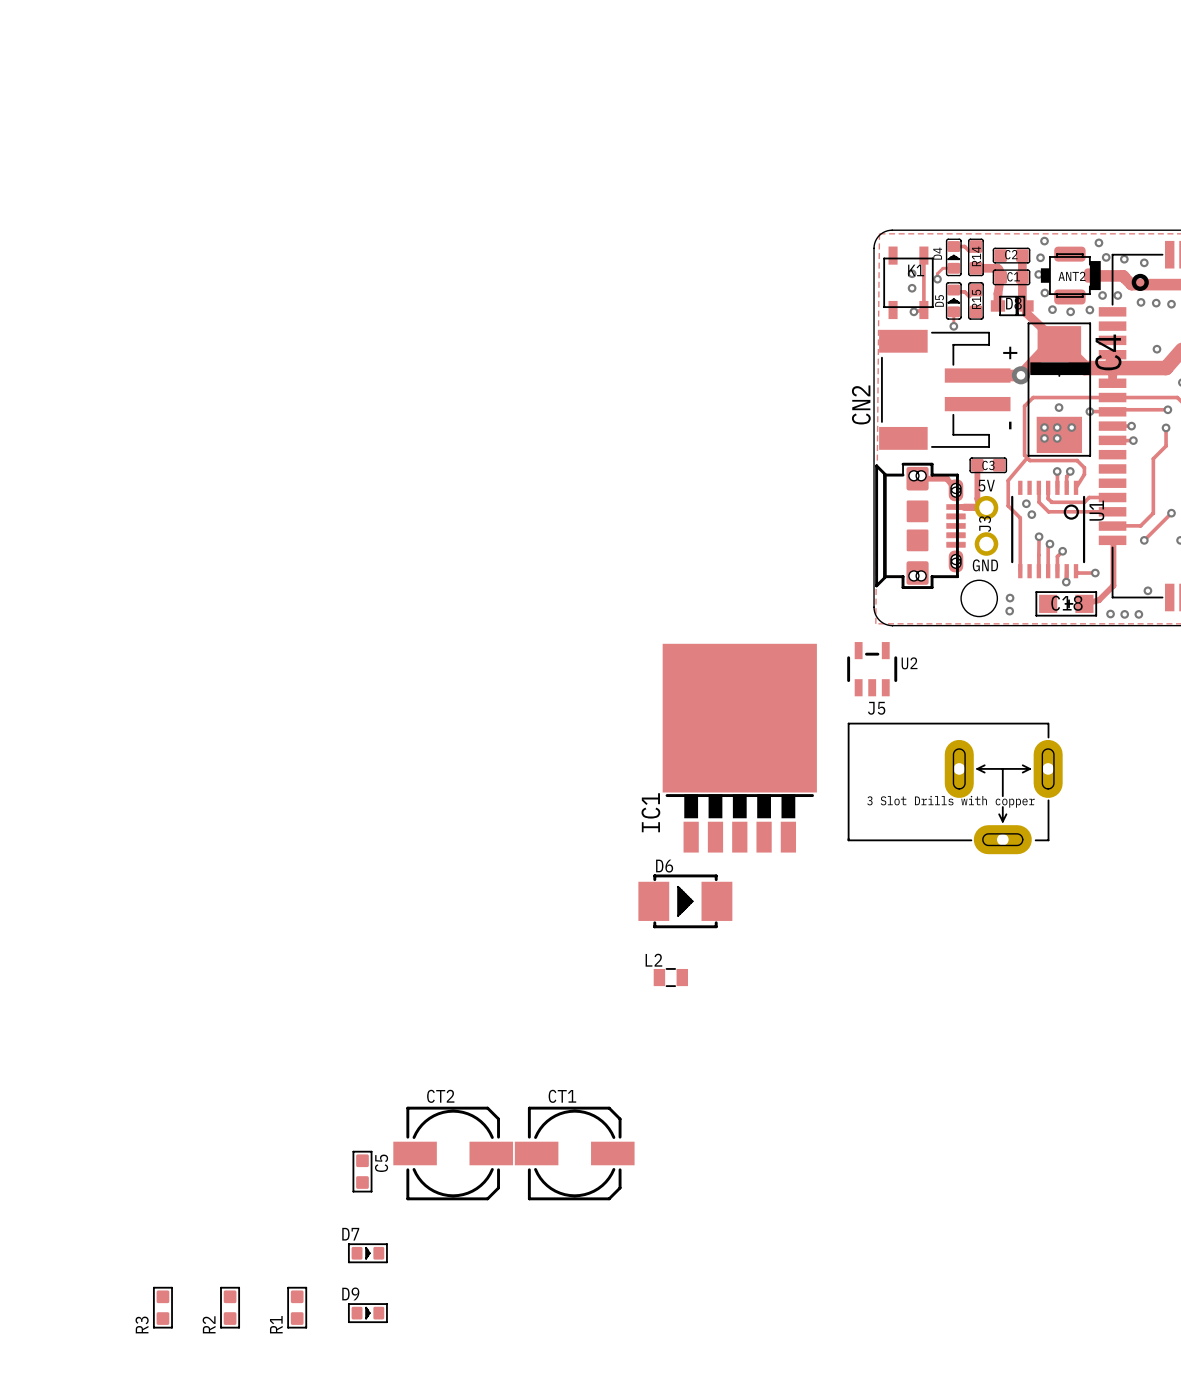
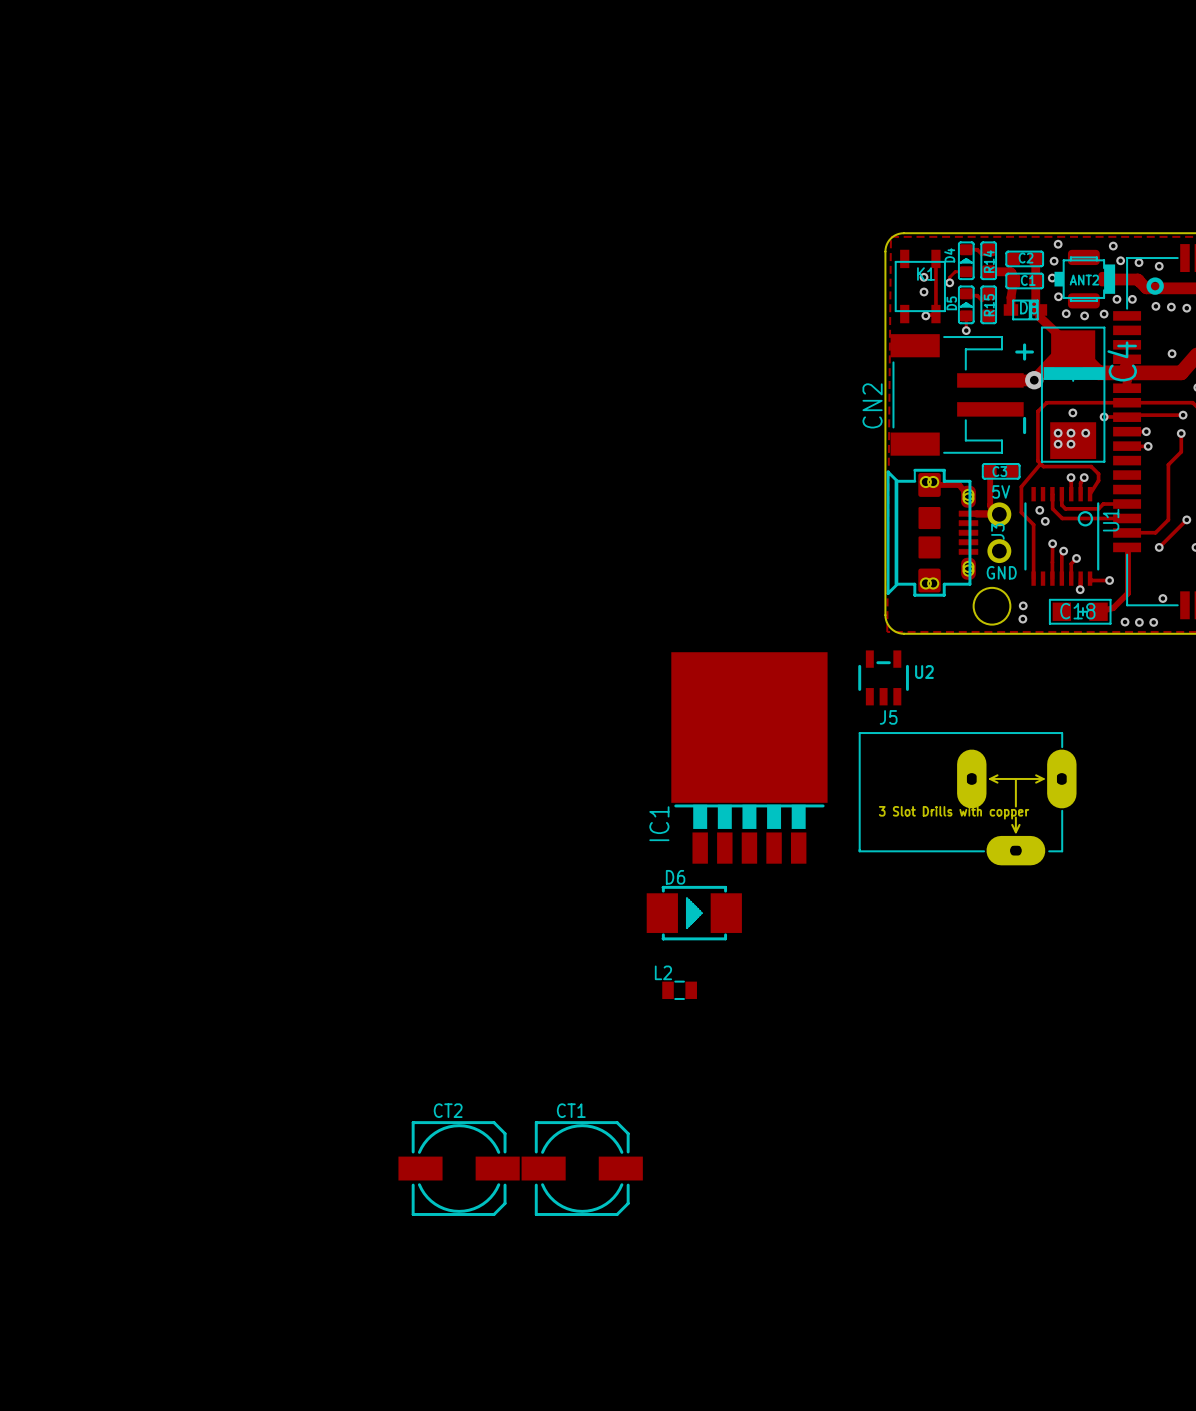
C5: (362, 1171) -> none
D7: (367, 1253) -> none
R3: (162, 1307) -> none
R2: (230, 1307) -> none
R1: (297, 1307) -> none
D9: (367, 1313) -> none

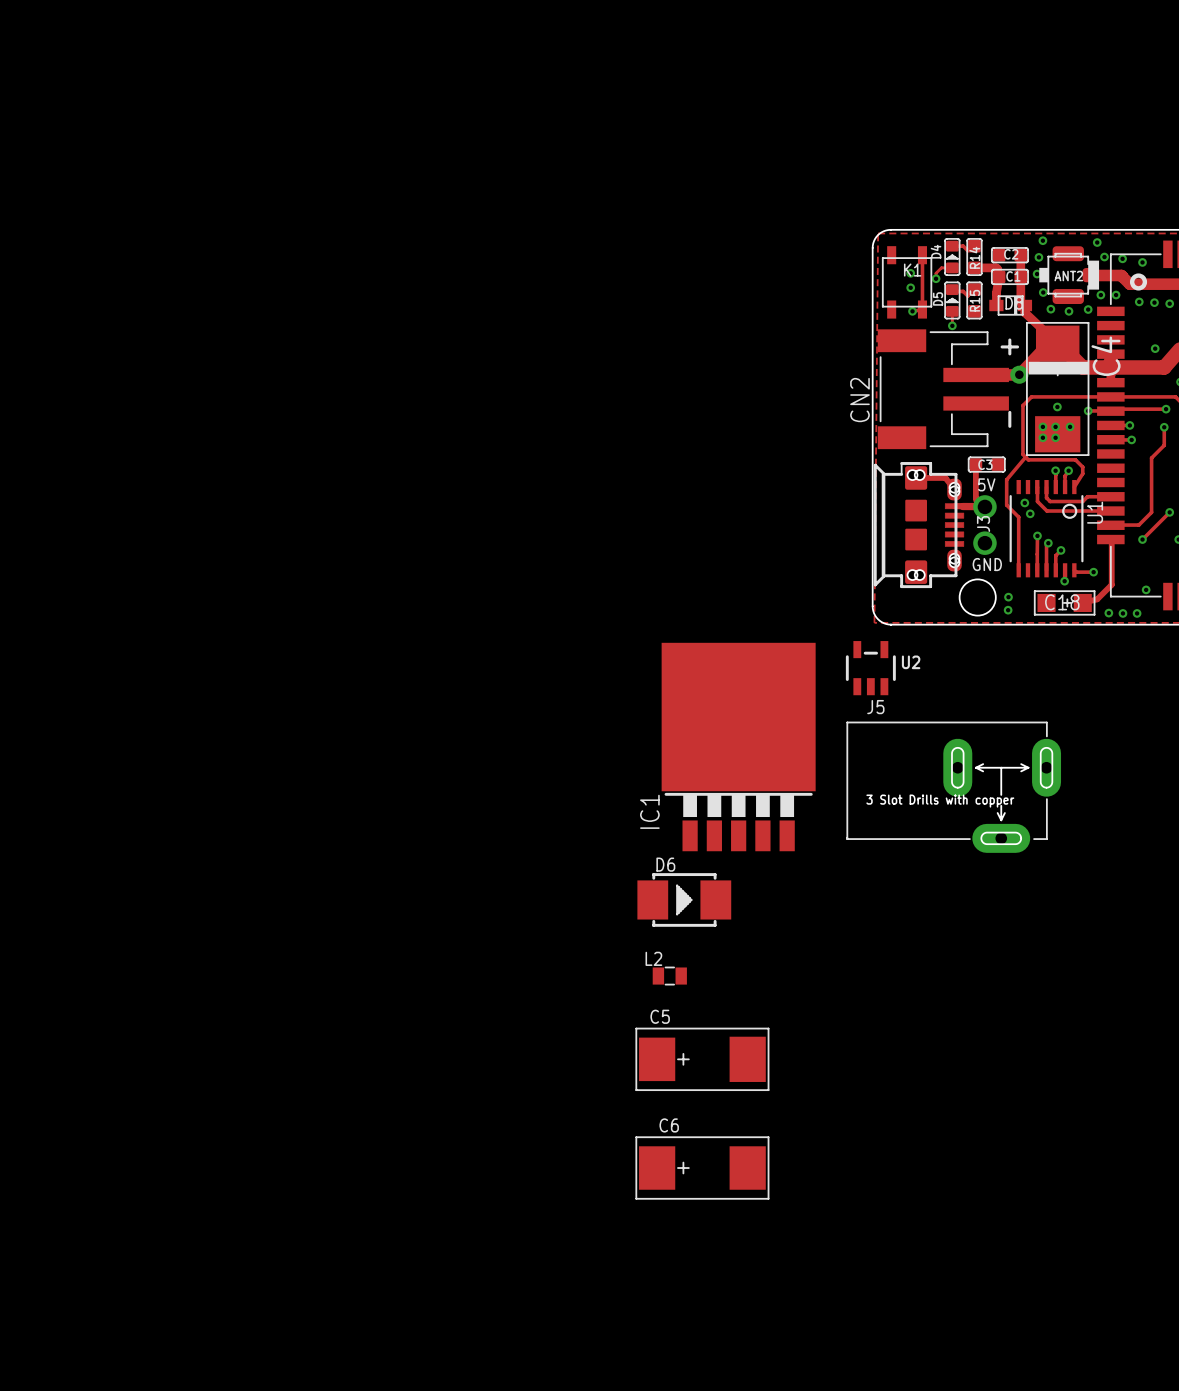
C5: none -> (702, 1059)
CT2: (459, 1168) -> none
CT1: (582, 1168) -> none
C6: none -> (702, 1168)

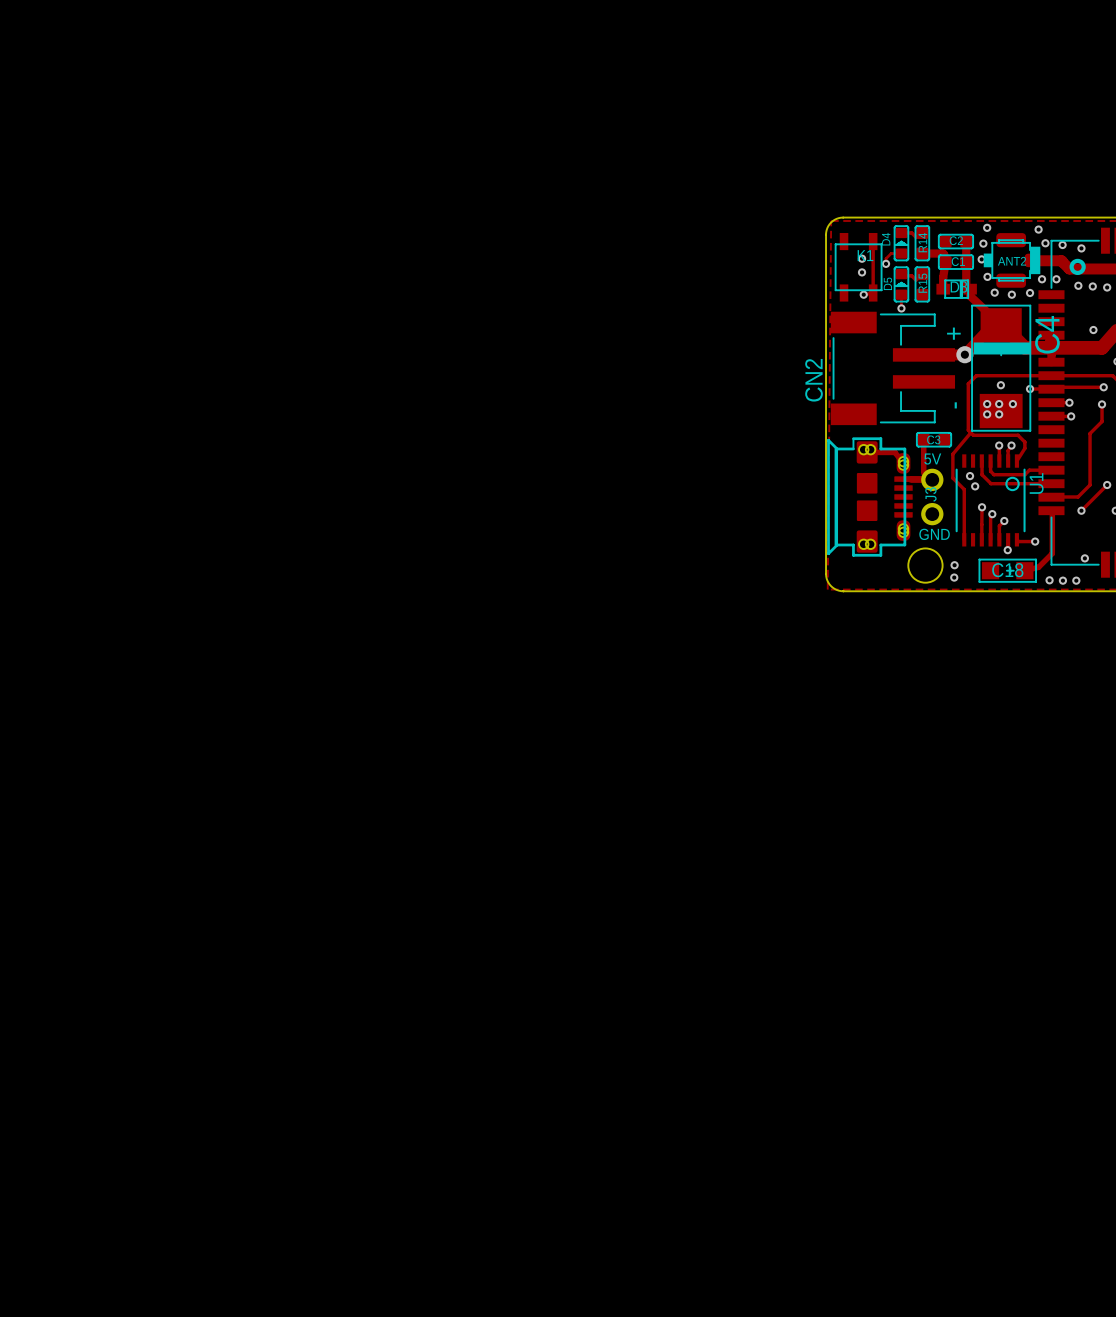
U2: (870, 668) -> none
IC1: (738, 747) -> none
J5: (953, 787) -> none
D6: (684, 899) -> none
L2: (669, 976) -> none
C5: (702, 1059) -> none
C6: (702, 1168) -> none

